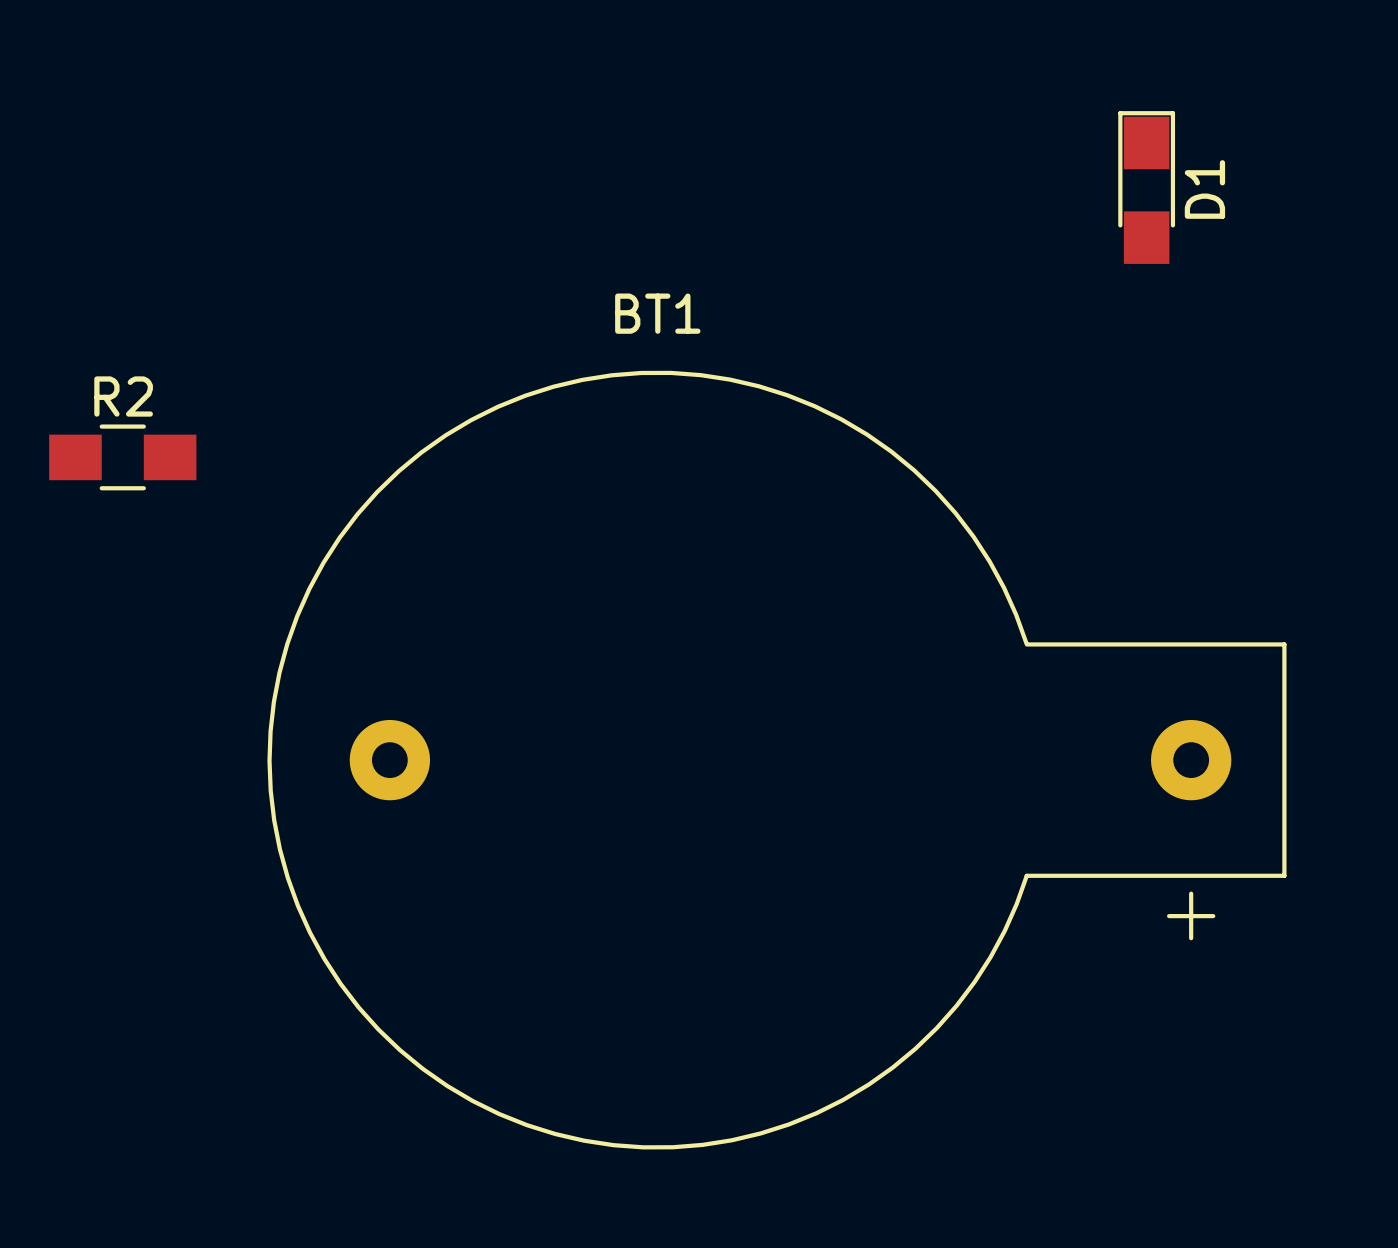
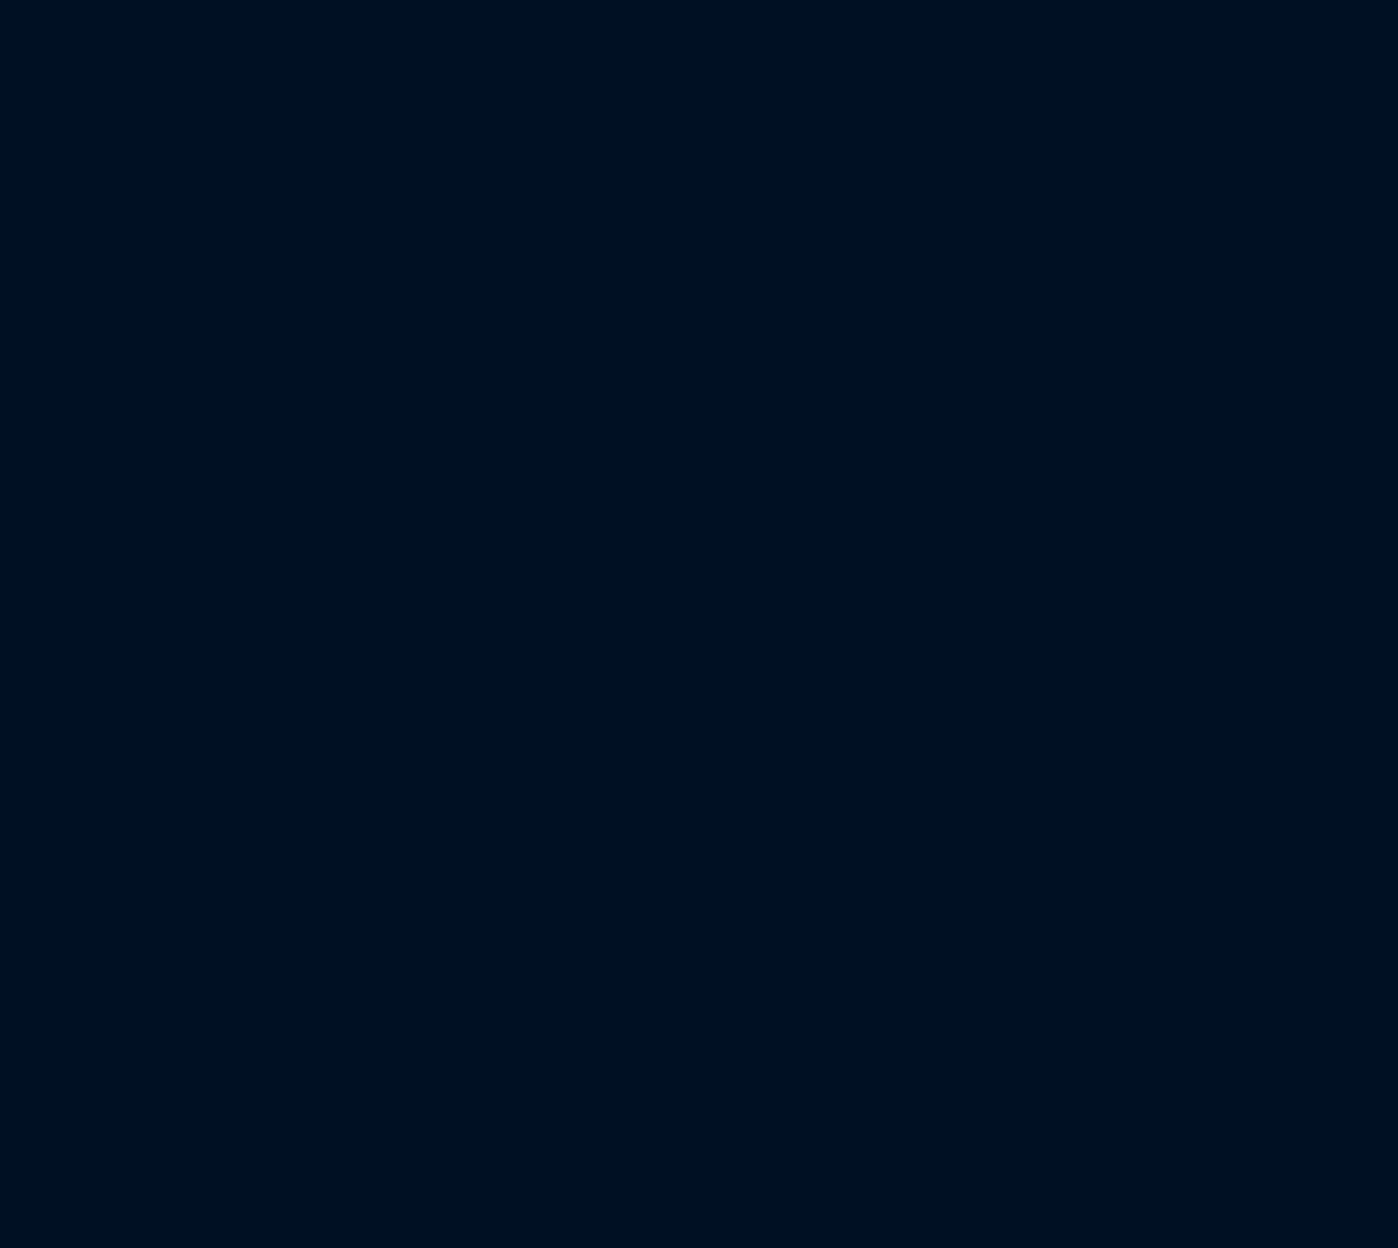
D1: (1146, 187) -> none
R2: (122, 457) -> none
BT1: (776, 760) -> none

